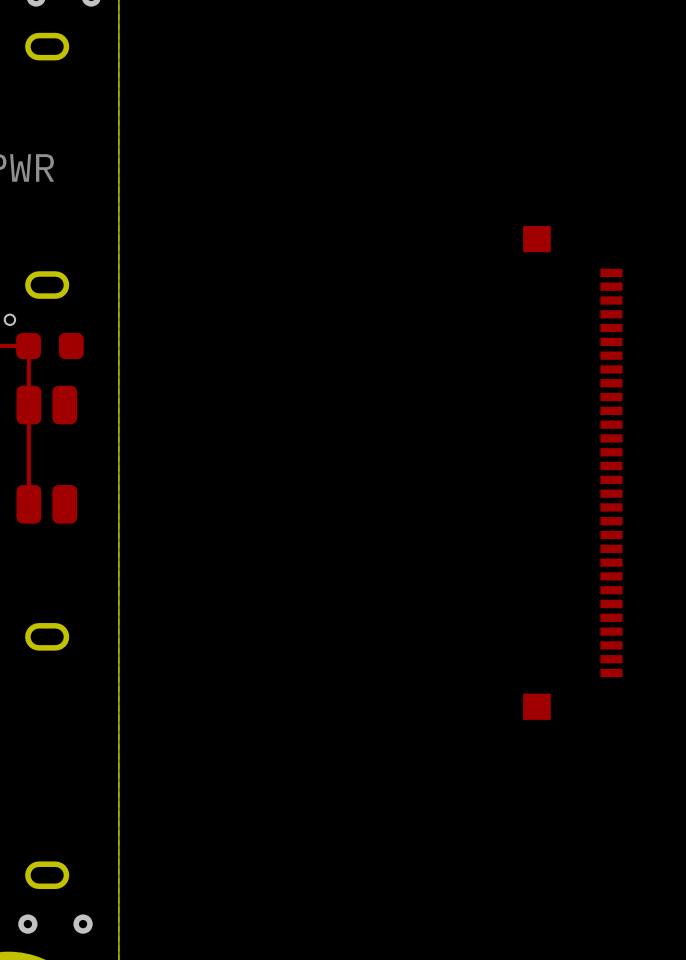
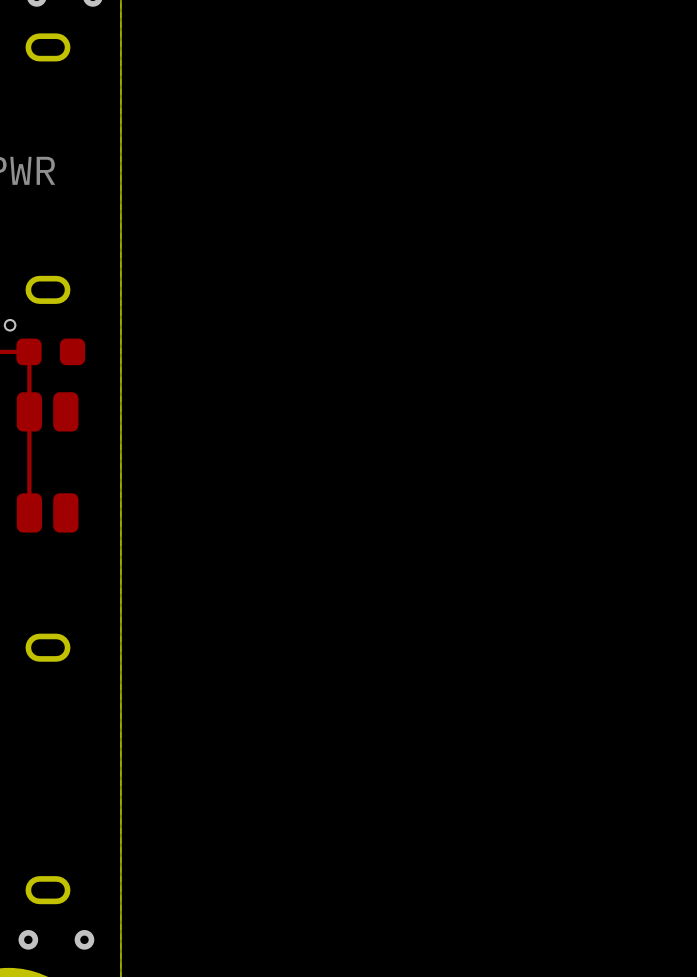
part: (572, 472) -> none

